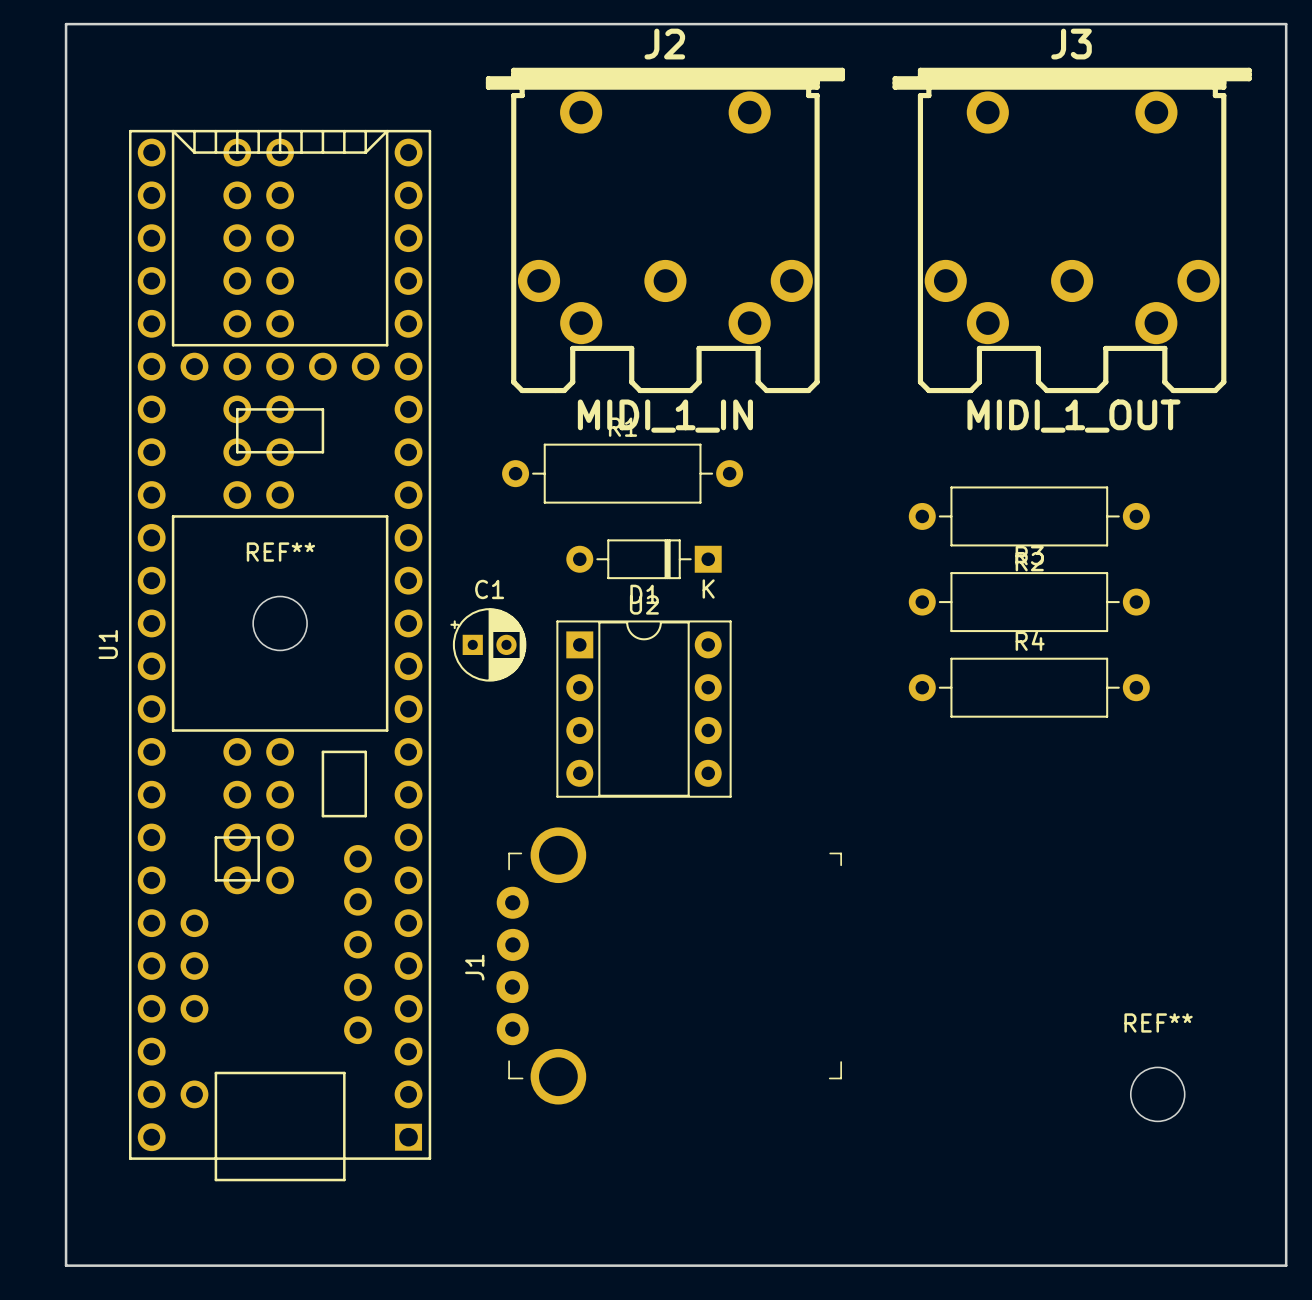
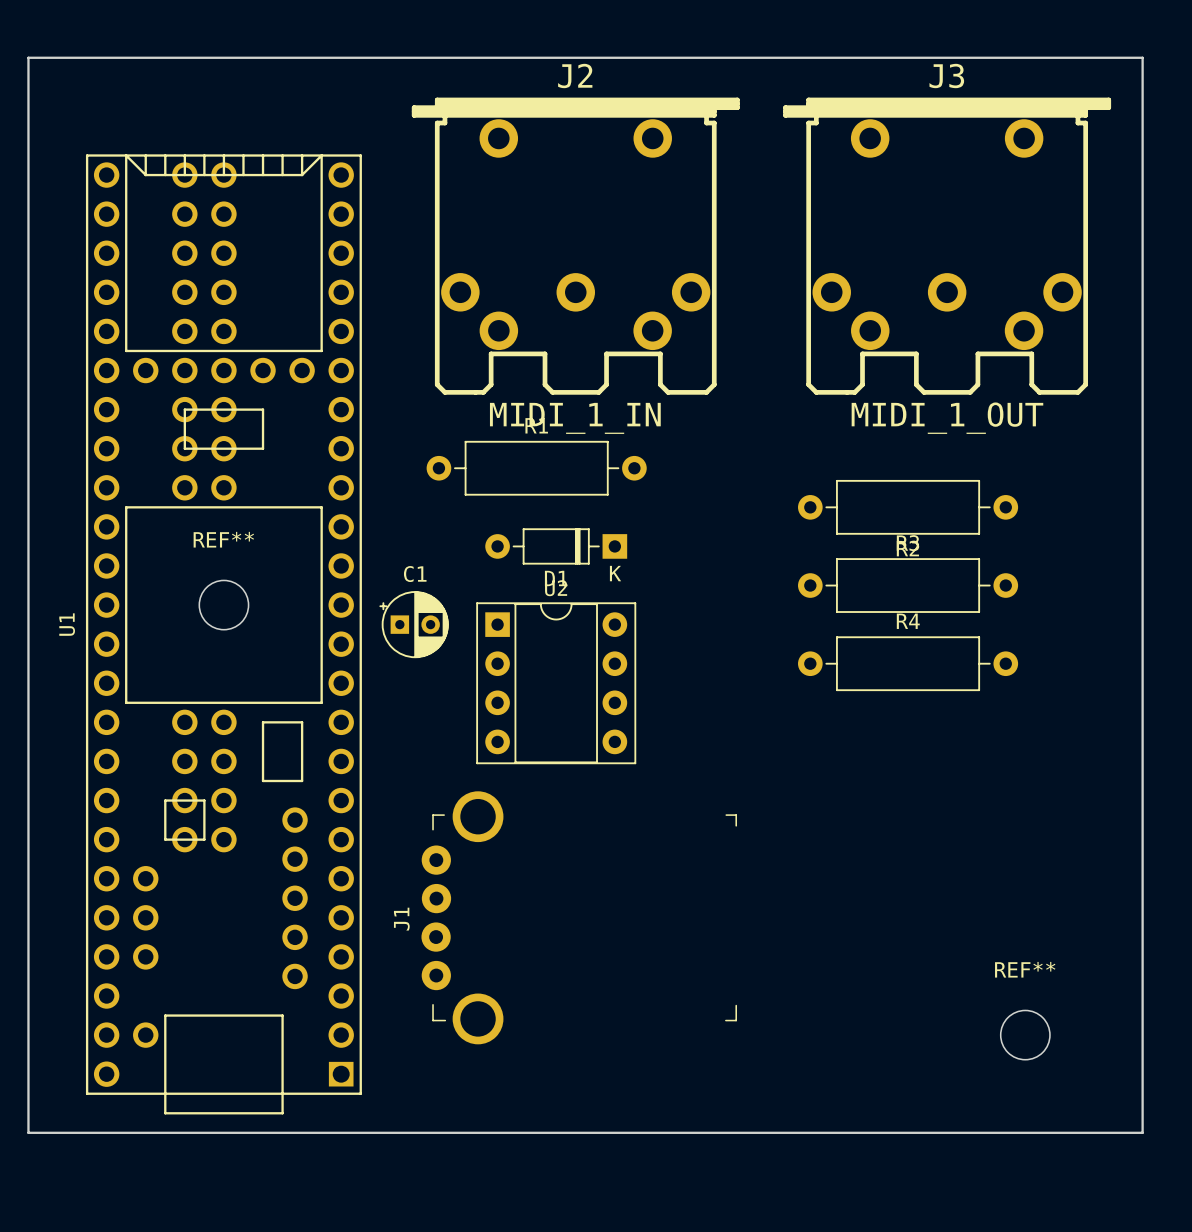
board edge: (66, 1201) (66, 1265) (1286, 1265) (1286, 1201) -> (28, 1132) (1142, 1132)

